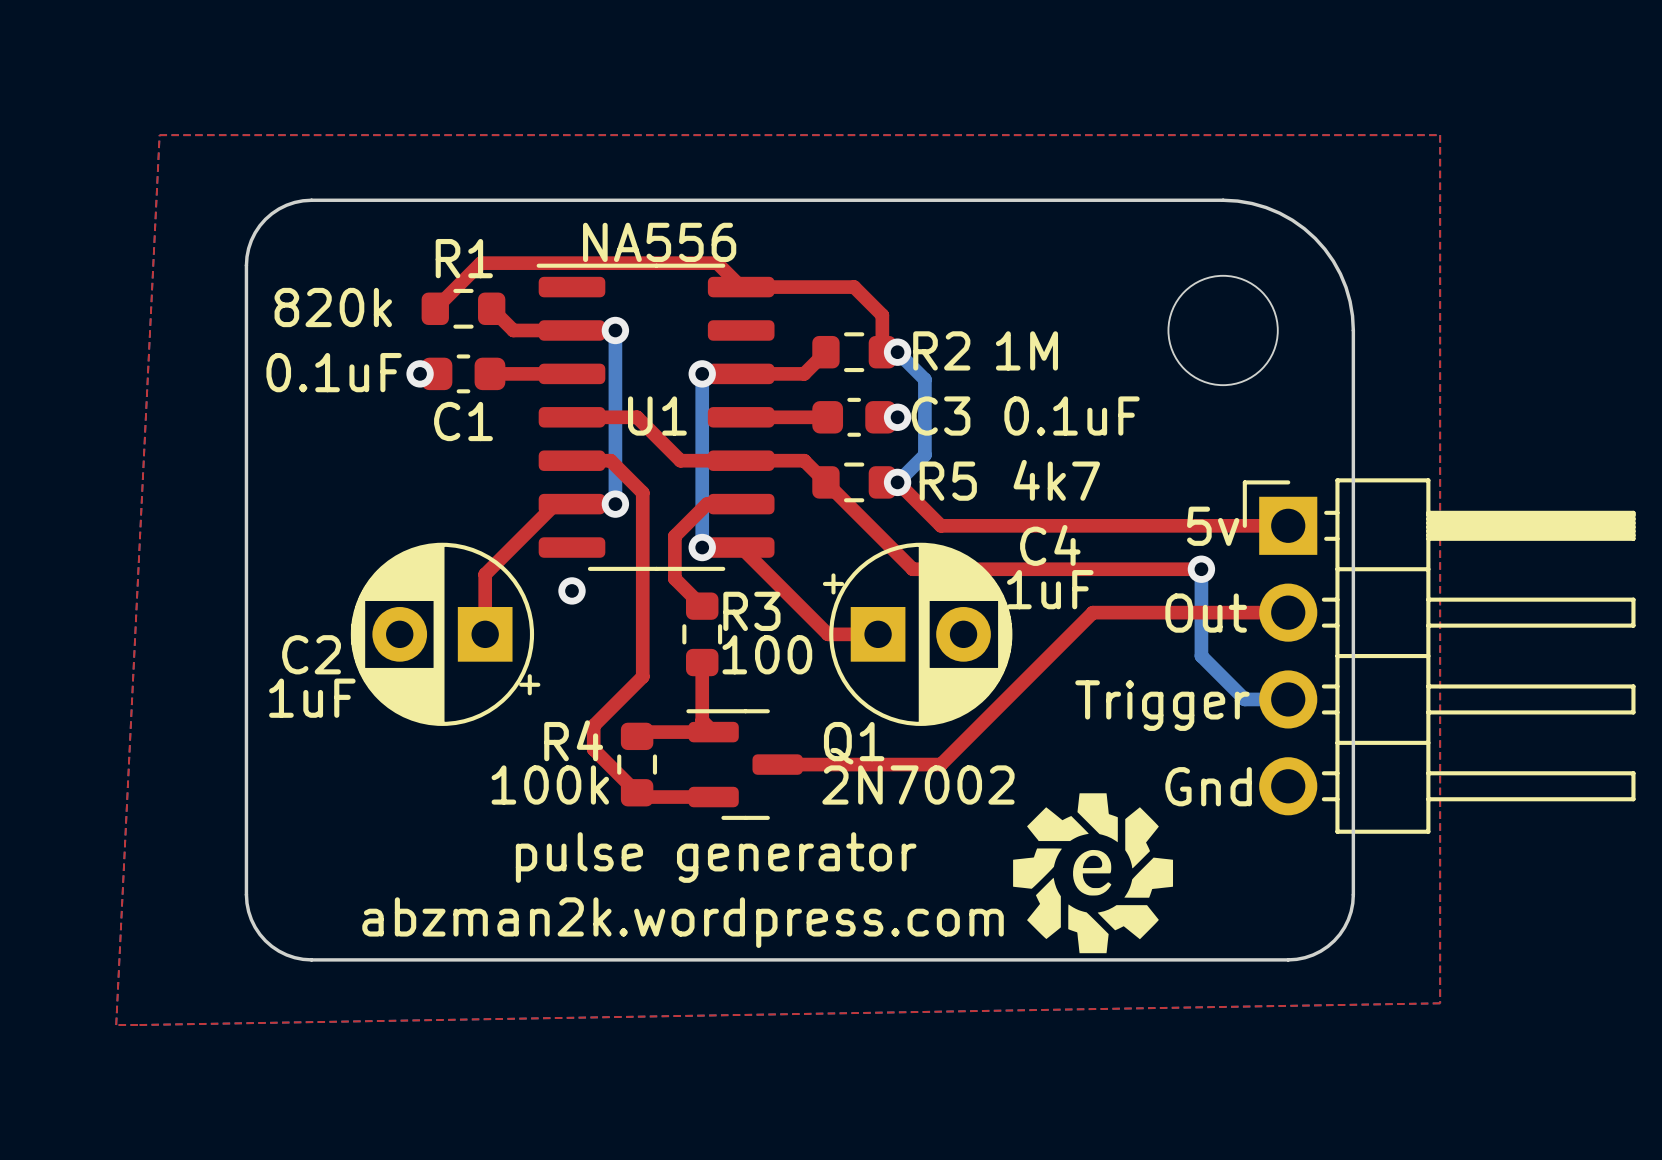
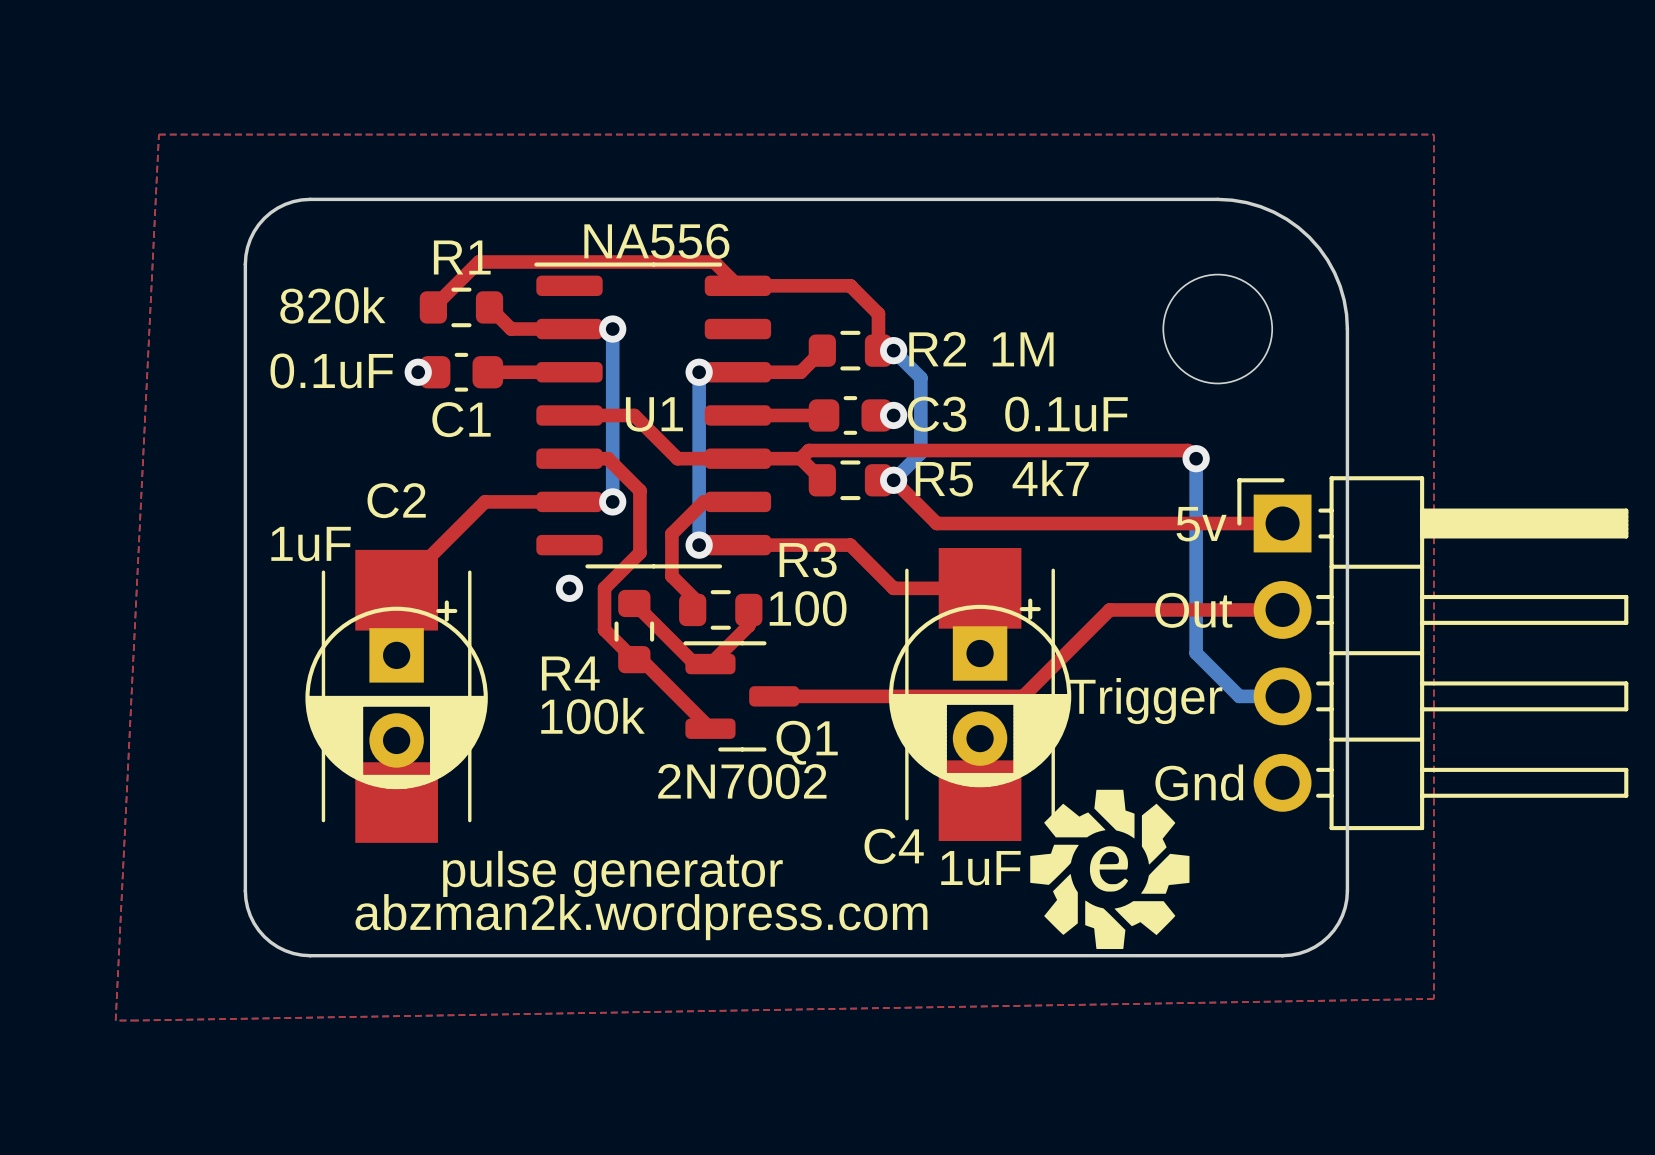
top track: none -> (800, 458) (808, 450) (1187, 450) (1196, 458)
bottom track: none -> (1196, 458) (1196, 566)
top track: (825, 482) (912, 569) (1201, 569) -> none
top track: (555, 504) (485, 574) (485, 634) -> (553, 501) (484, 501) (396, 590)
C4 name position: C4 (1050, 545) -> C4 (894, 846)
top track: (741, 547) (828, 634) (878, 634) -> (737, 545) (850, 545) (893, 588) (980, 588)
top track: (642, 555) (642, 676) (593, 725) (593, 749) (641, 797) (713, 797) -> (639, 552) (604, 588) (604, 629) (634, 659) (641, 659) (710, 728)
via position: (1201, 569) -> (1196, 458)
top track: none -> (634, 603) (694, 664) (710, 664) (748, 625) (748, 609)
top track: (1114, 612) (1092, 612) (940, 764) (777, 764) -> (1109, 609) (1023, 696) (774, 696)
C2 rotation: 0° (445, 634) -> 90° counterclockwise (396, 694)
R3 rotation: 0° (702, 634) -> 90° clockwise (720, 609)
C4 rotation: 0° (917, 634) -> 90° clockwise (980, 692)
C2 name position: C2 (311, 654) -> C2 (396, 500)
top track: (702, 662) (702, 720) (713, 732) (641, 732) (637, 736) -> none
part: none -> (980, 694)
C2 value position: 1uF (312, 698) -> 1uF (311, 544)
part: none -> (396, 696)
R4 name position: R4 (573, 740) -> R4 (570, 673)
Q1 name position: Q1 (854, 743) -> Q1 (807, 742)
R4 position: (637, 764) -> (634, 631)
Q1 position: (744, 764) -> (741, 696)
R4 value position: 100k (550, 784) -> 100k (593, 716)
Q1 value position: 2N7002 (918, 784) -> 2N7002 (742, 781)
text position: pulse generator (716, 857) -> pulse generator (612, 873)
drawing position: (1093, 873) -> (1109, 869)

